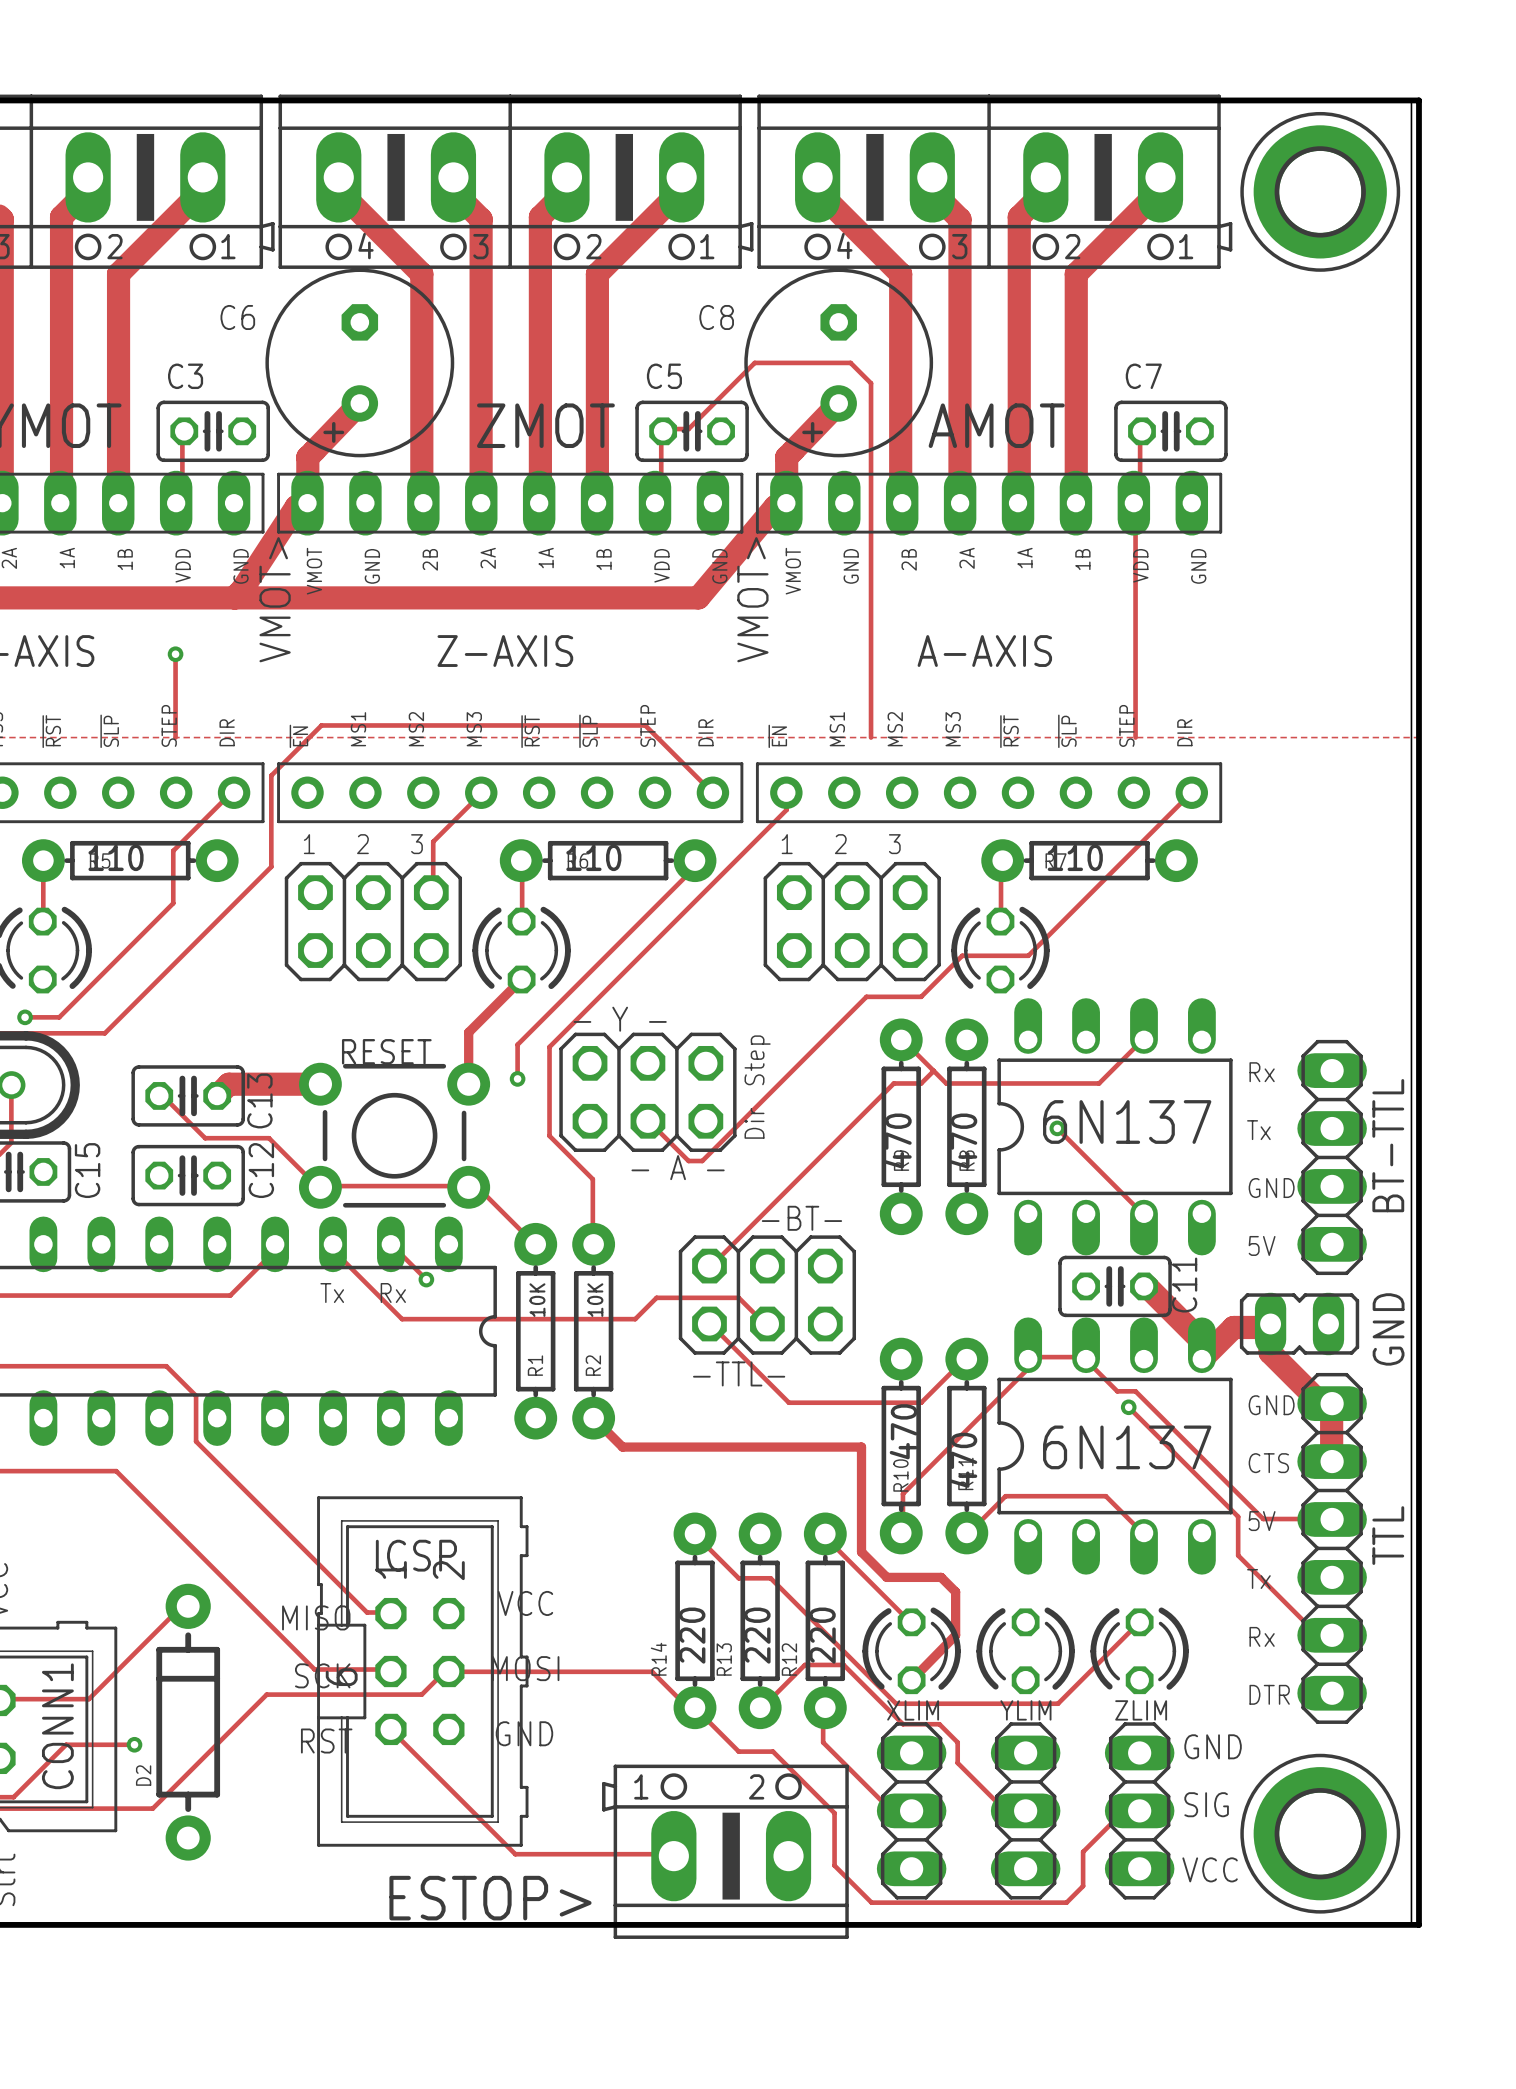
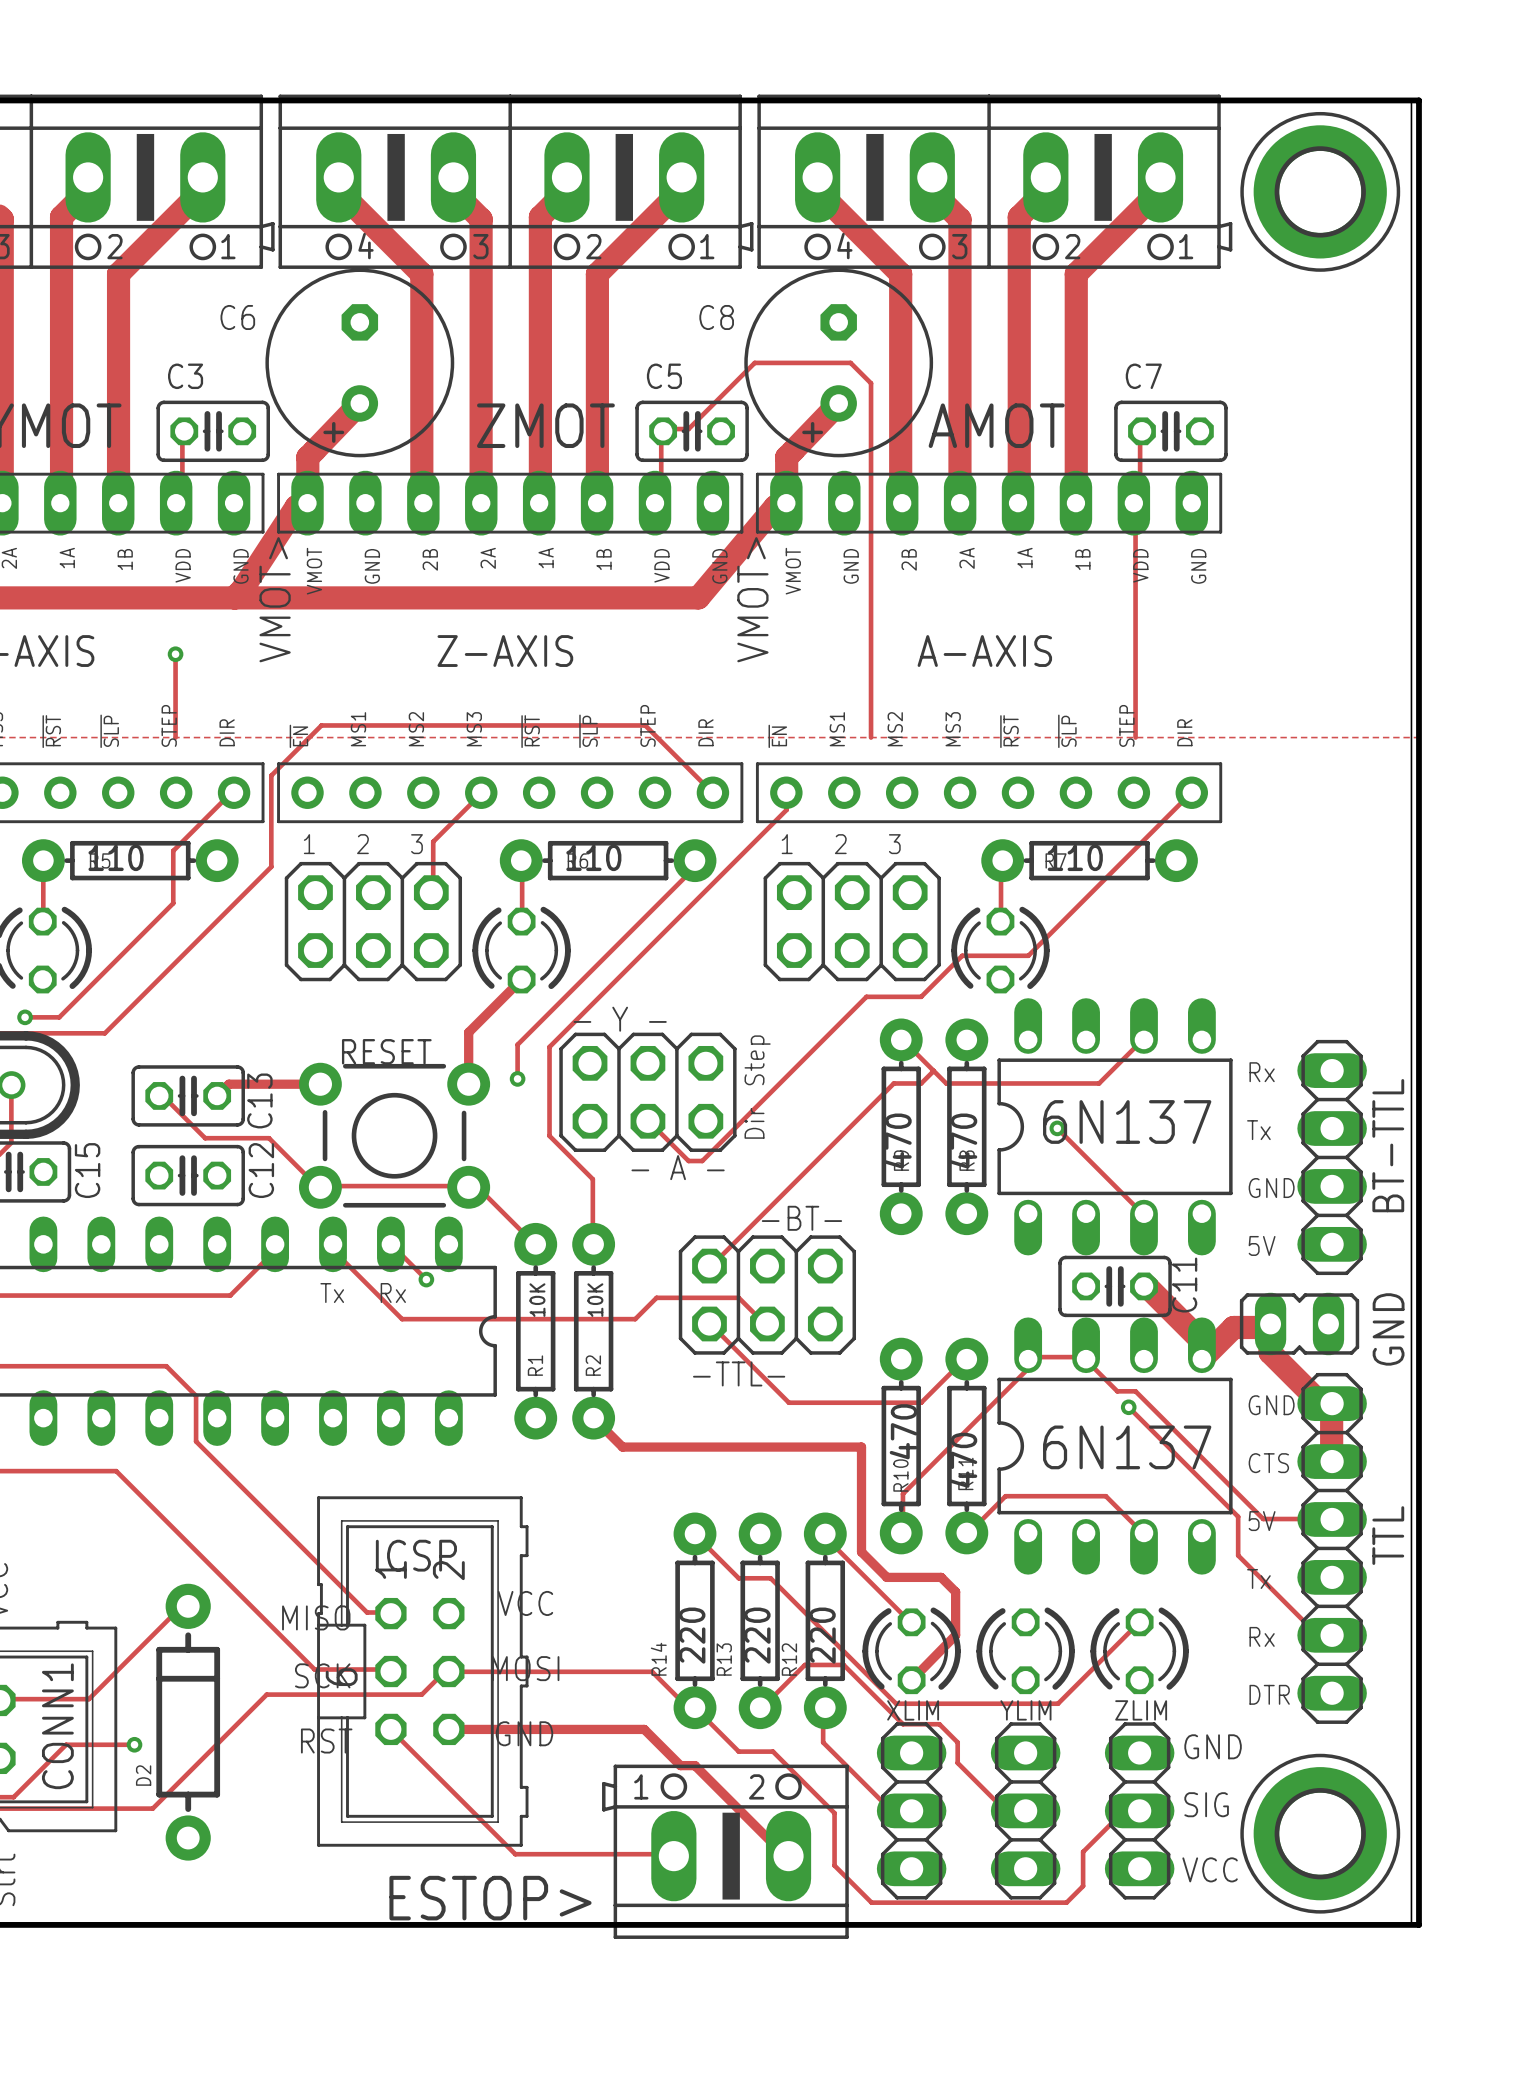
track width: thick (320, 1084) (228, 1084) (217, 1095) -> thin (320, 1084) (228, 1084) (217, 1095)
track: none -> (448, 1729) (644, 1729) (680, 1765) (695, 1765) (781, 1852)

